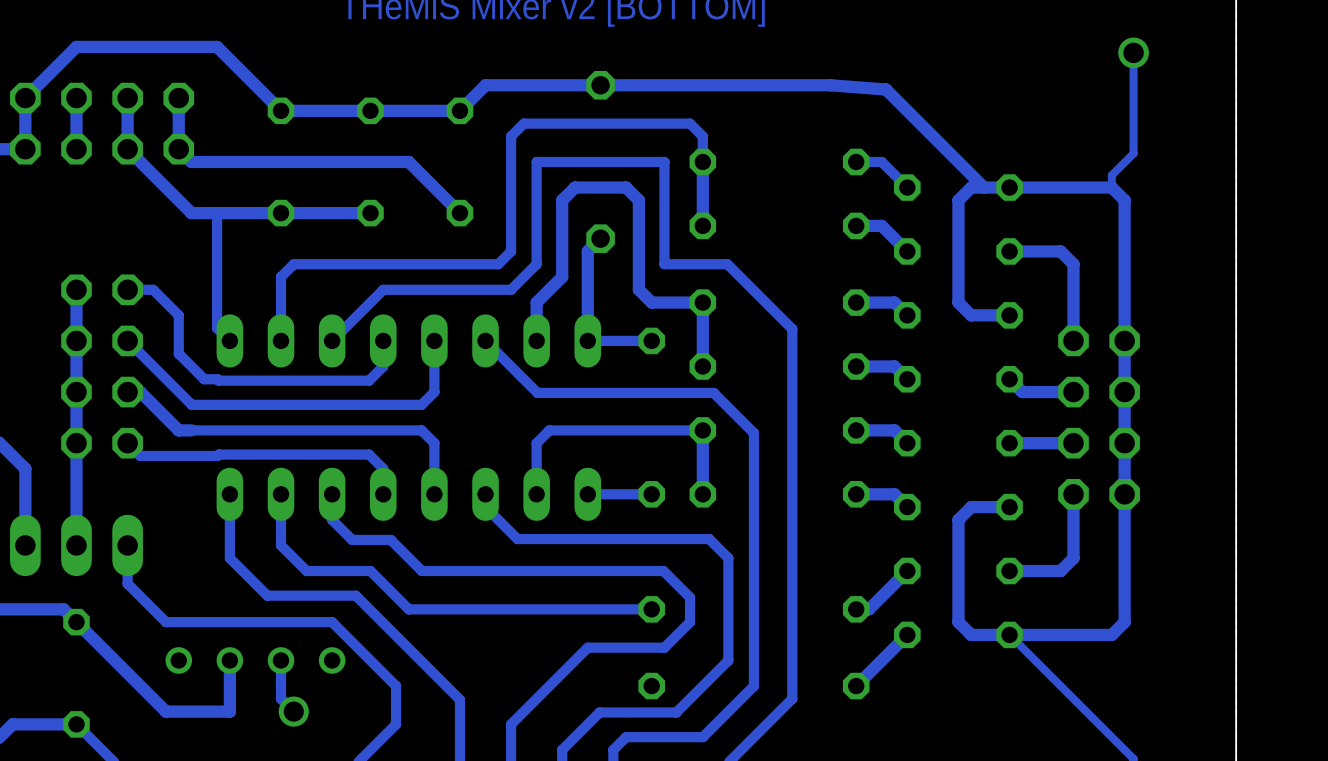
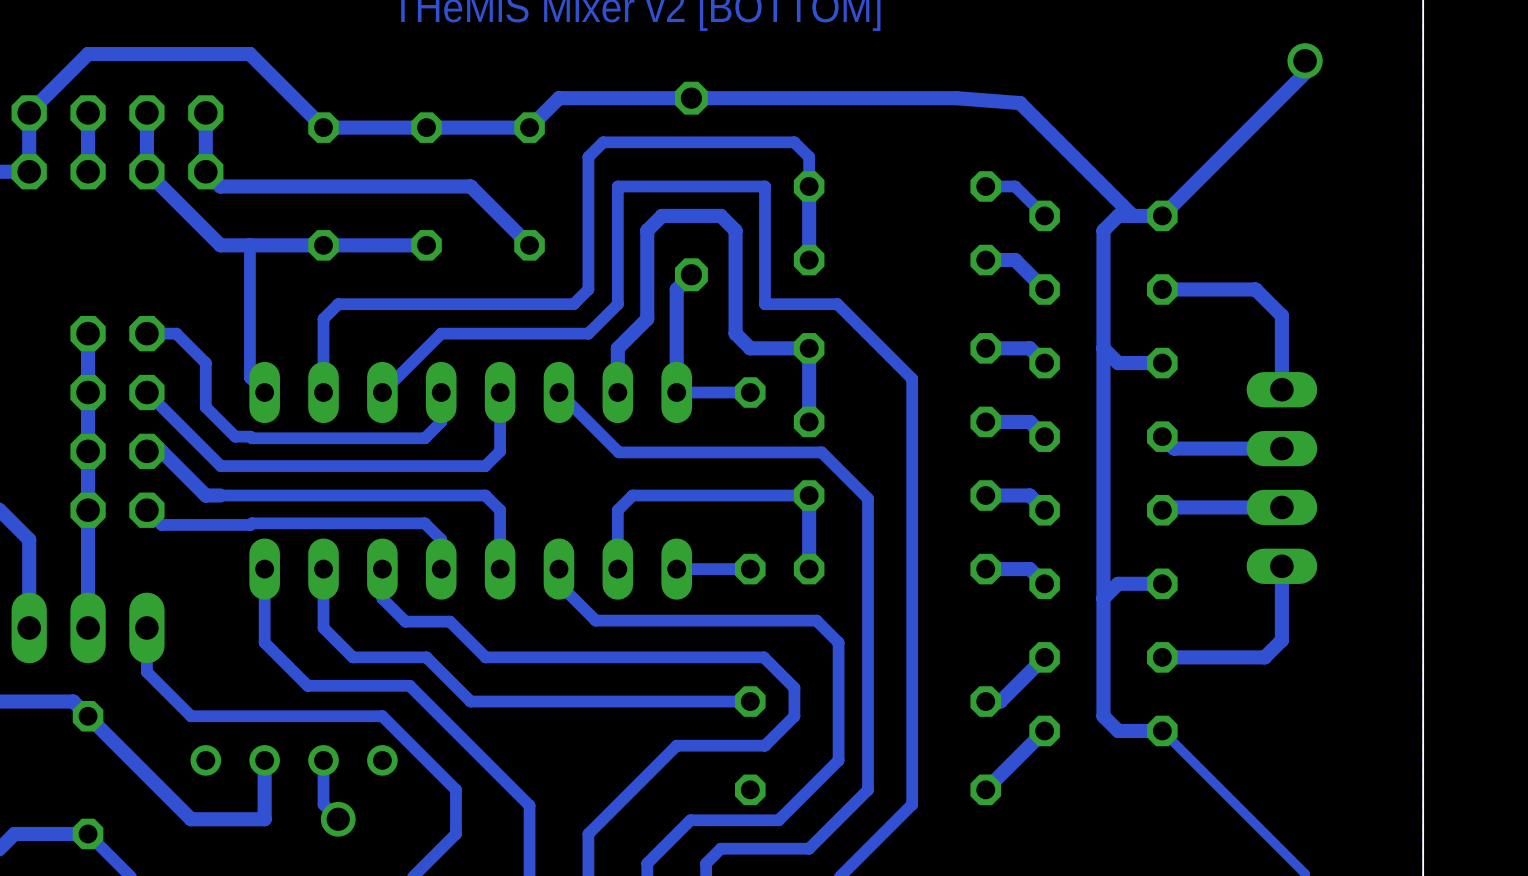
track: (1133, 63) (1133, 153) (1111, 175) (1111, 187) -> (1305, 73) (1162, 215)
track: (1111, 187) (1009, 187) -> none
track: (1111, 187) (1124, 200) (1124, 622) (1111, 634) (1009, 634) -> none
track: (1060, 251) (1073, 264) (1073, 340) -> (1221, 289) (1255, 289) (1281, 315) (1281, 389)
track: none -> (1103, 348) (1103, 598)
part footprint: [1058, 325, 1140, 510] -> [1246, 372, 1318, 584]
track: (1019, 389) (1022, 392) (1073, 392) -> (1174, 448) (1281, 448)
track: (1073, 443) (1009, 443) -> (1281, 507) (1165, 507) (1162, 510)
track: (1073, 494) (1073, 558) (1060, 571) -> (1281, 566) (1281, 640) (1264, 657) (1221, 657)

